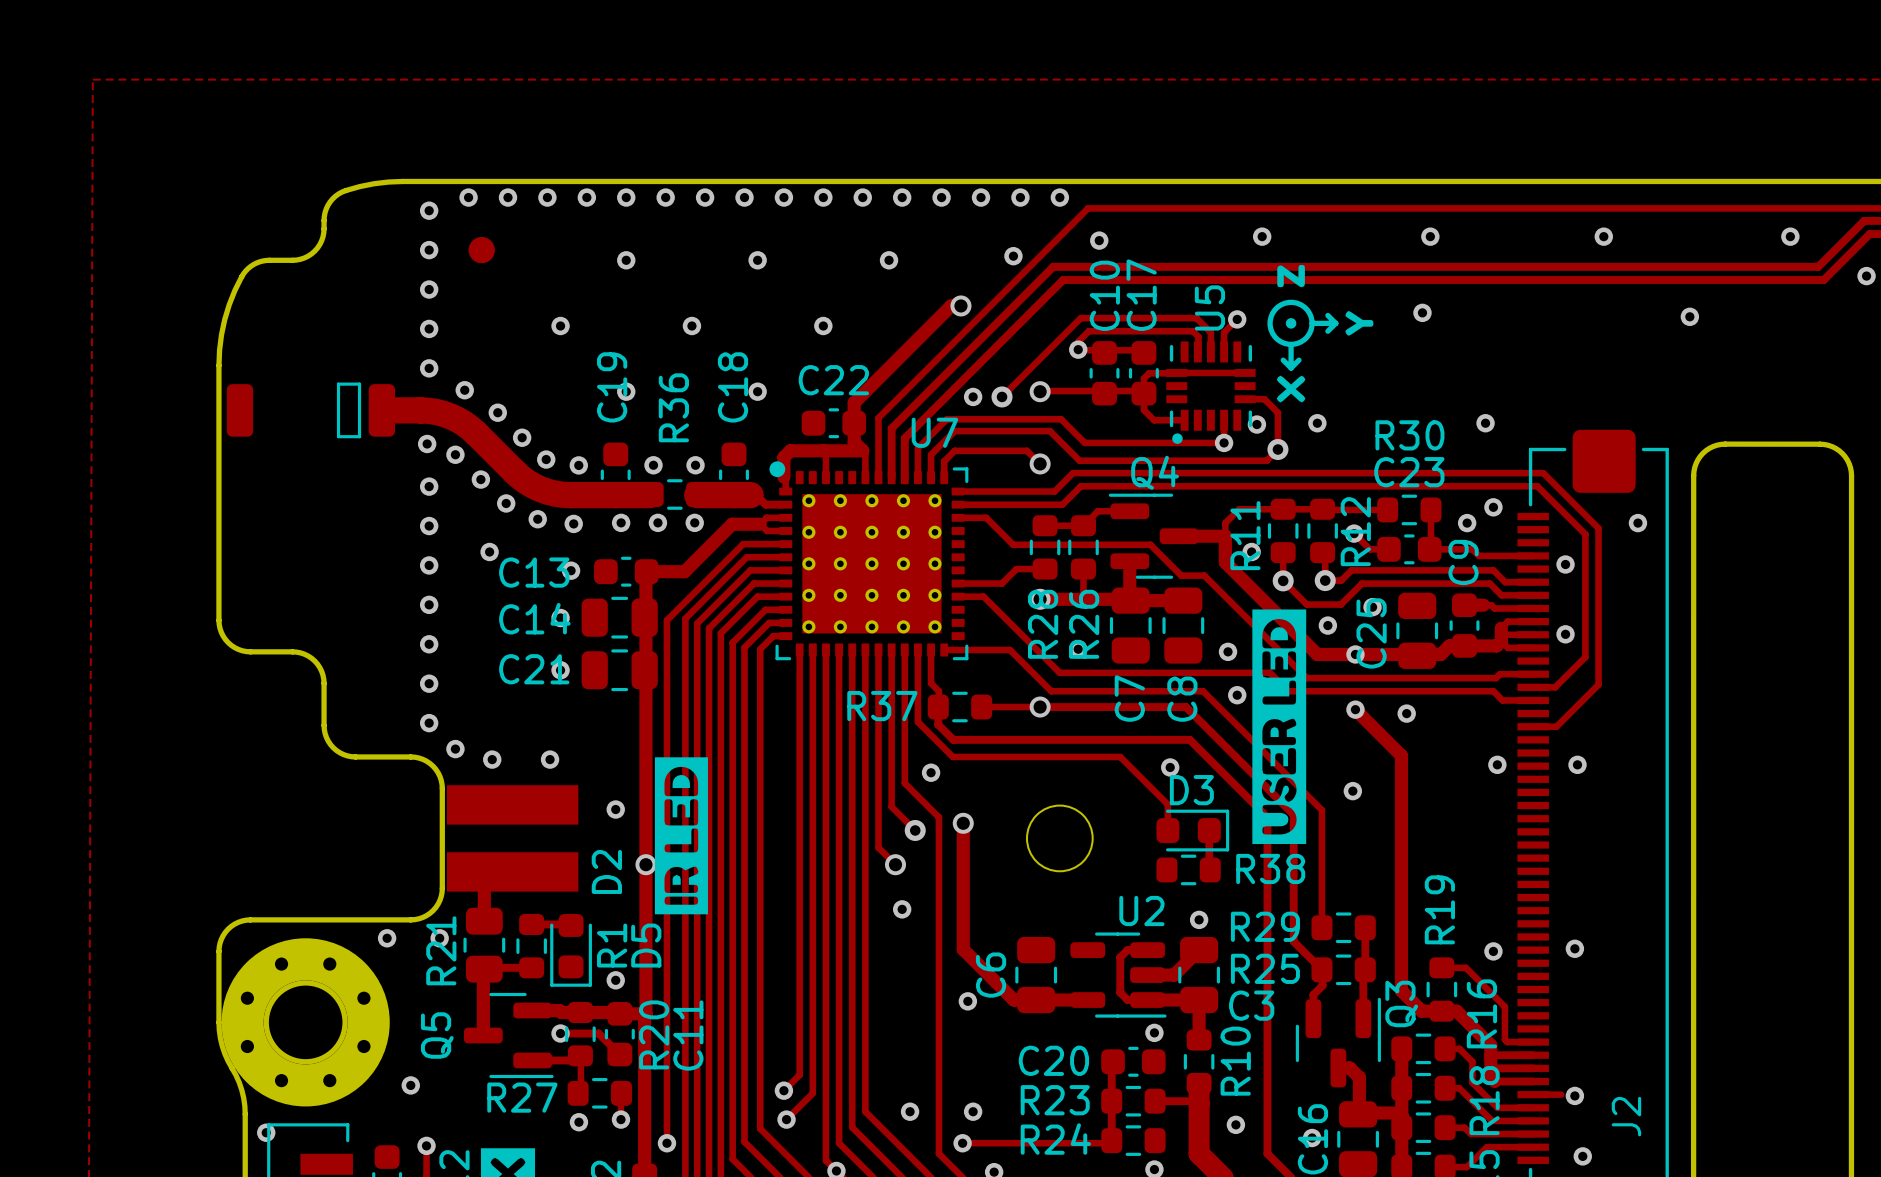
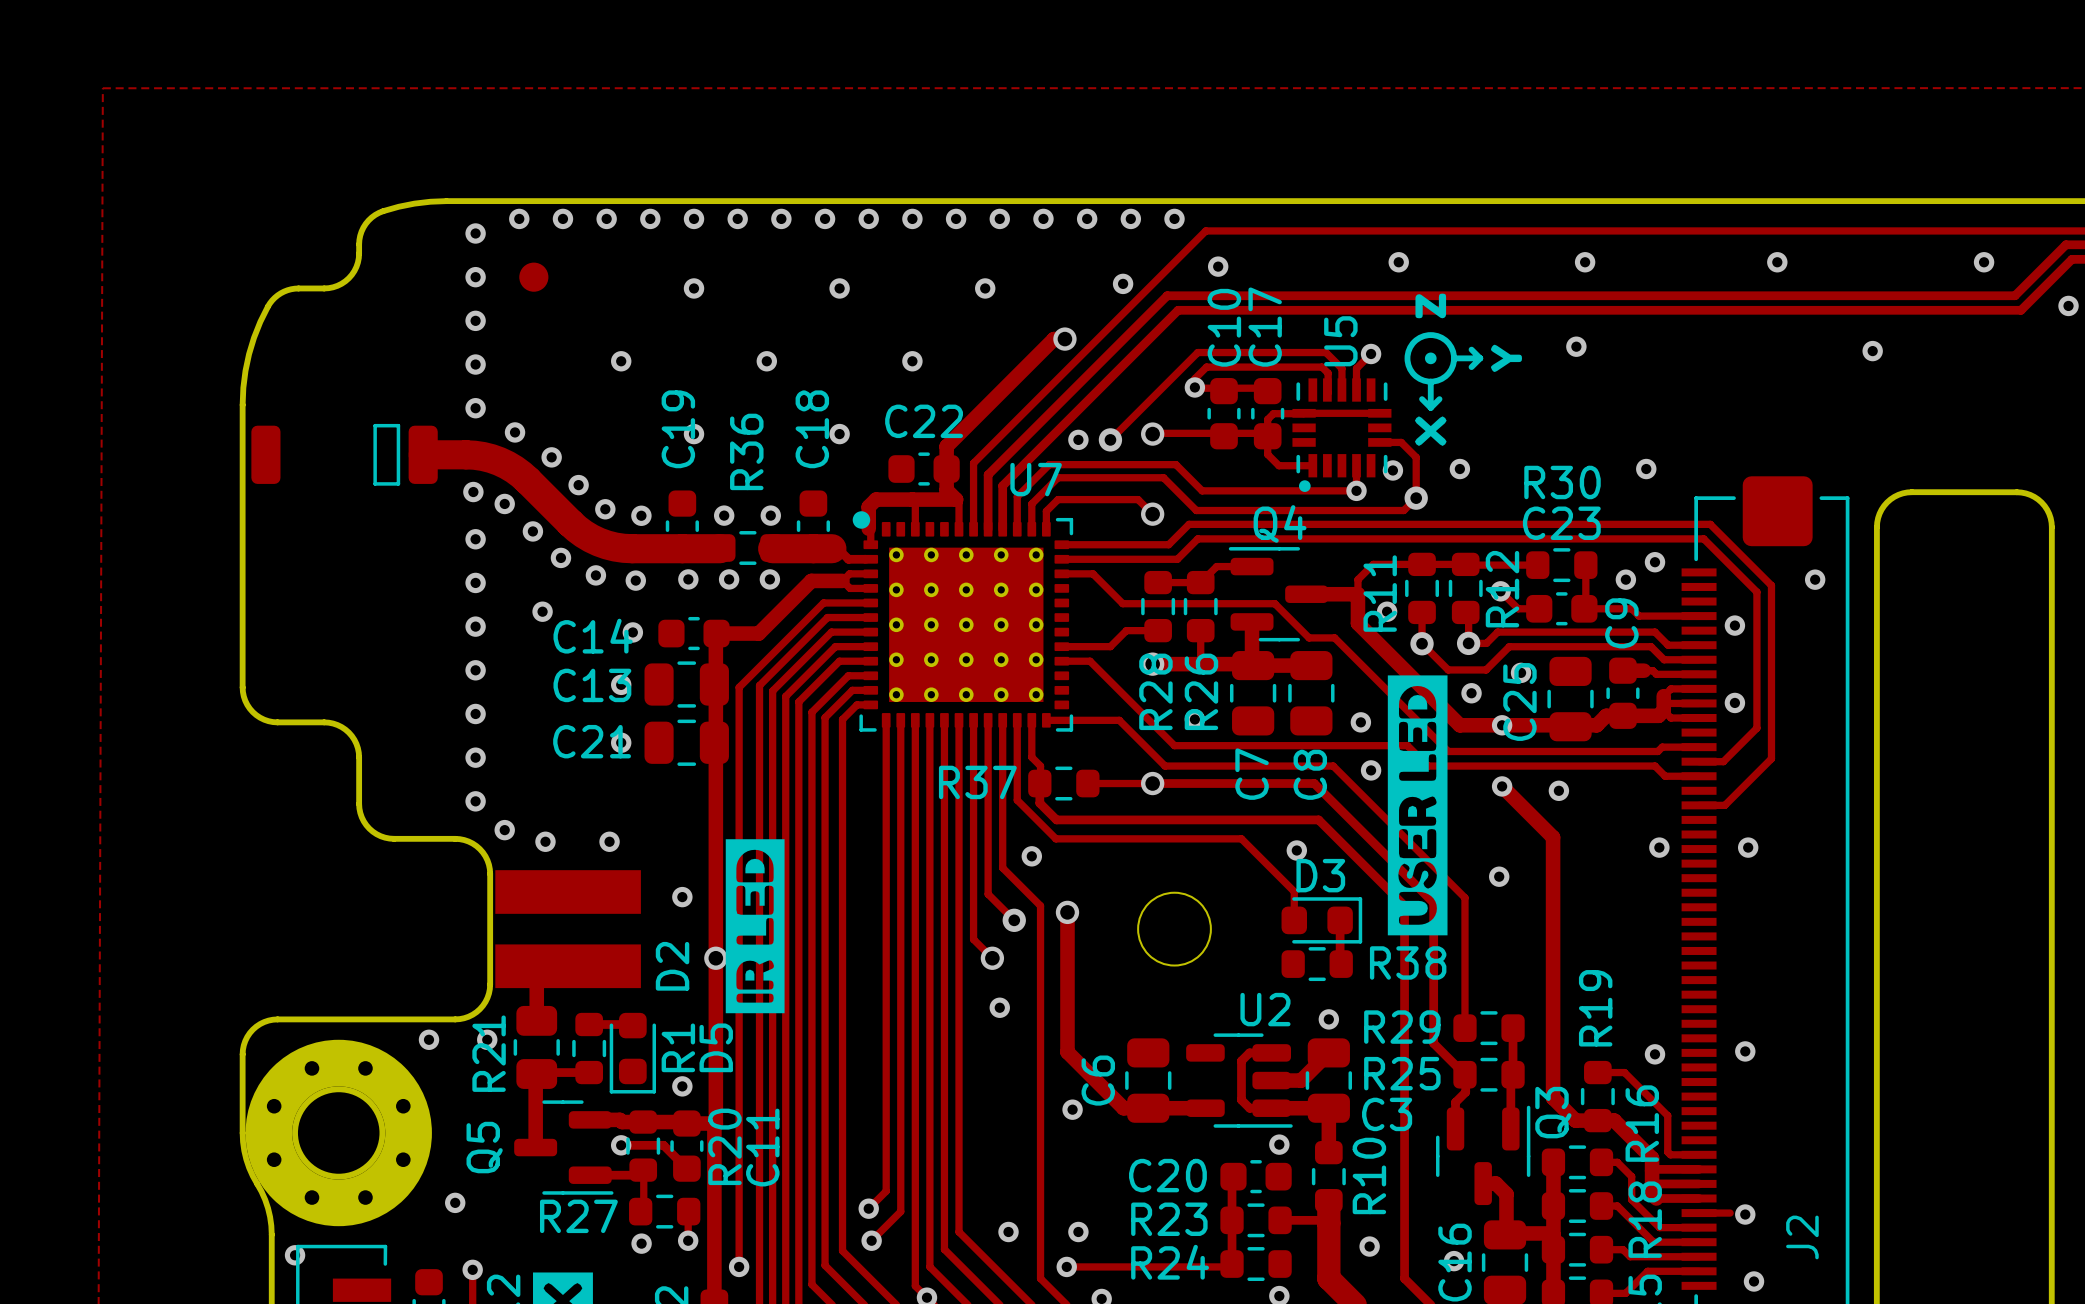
C13 name position: C13 (534, 572) -> C13 (592, 685)
C14 name position: C14 (534, 618) -> C14 (593, 636)

